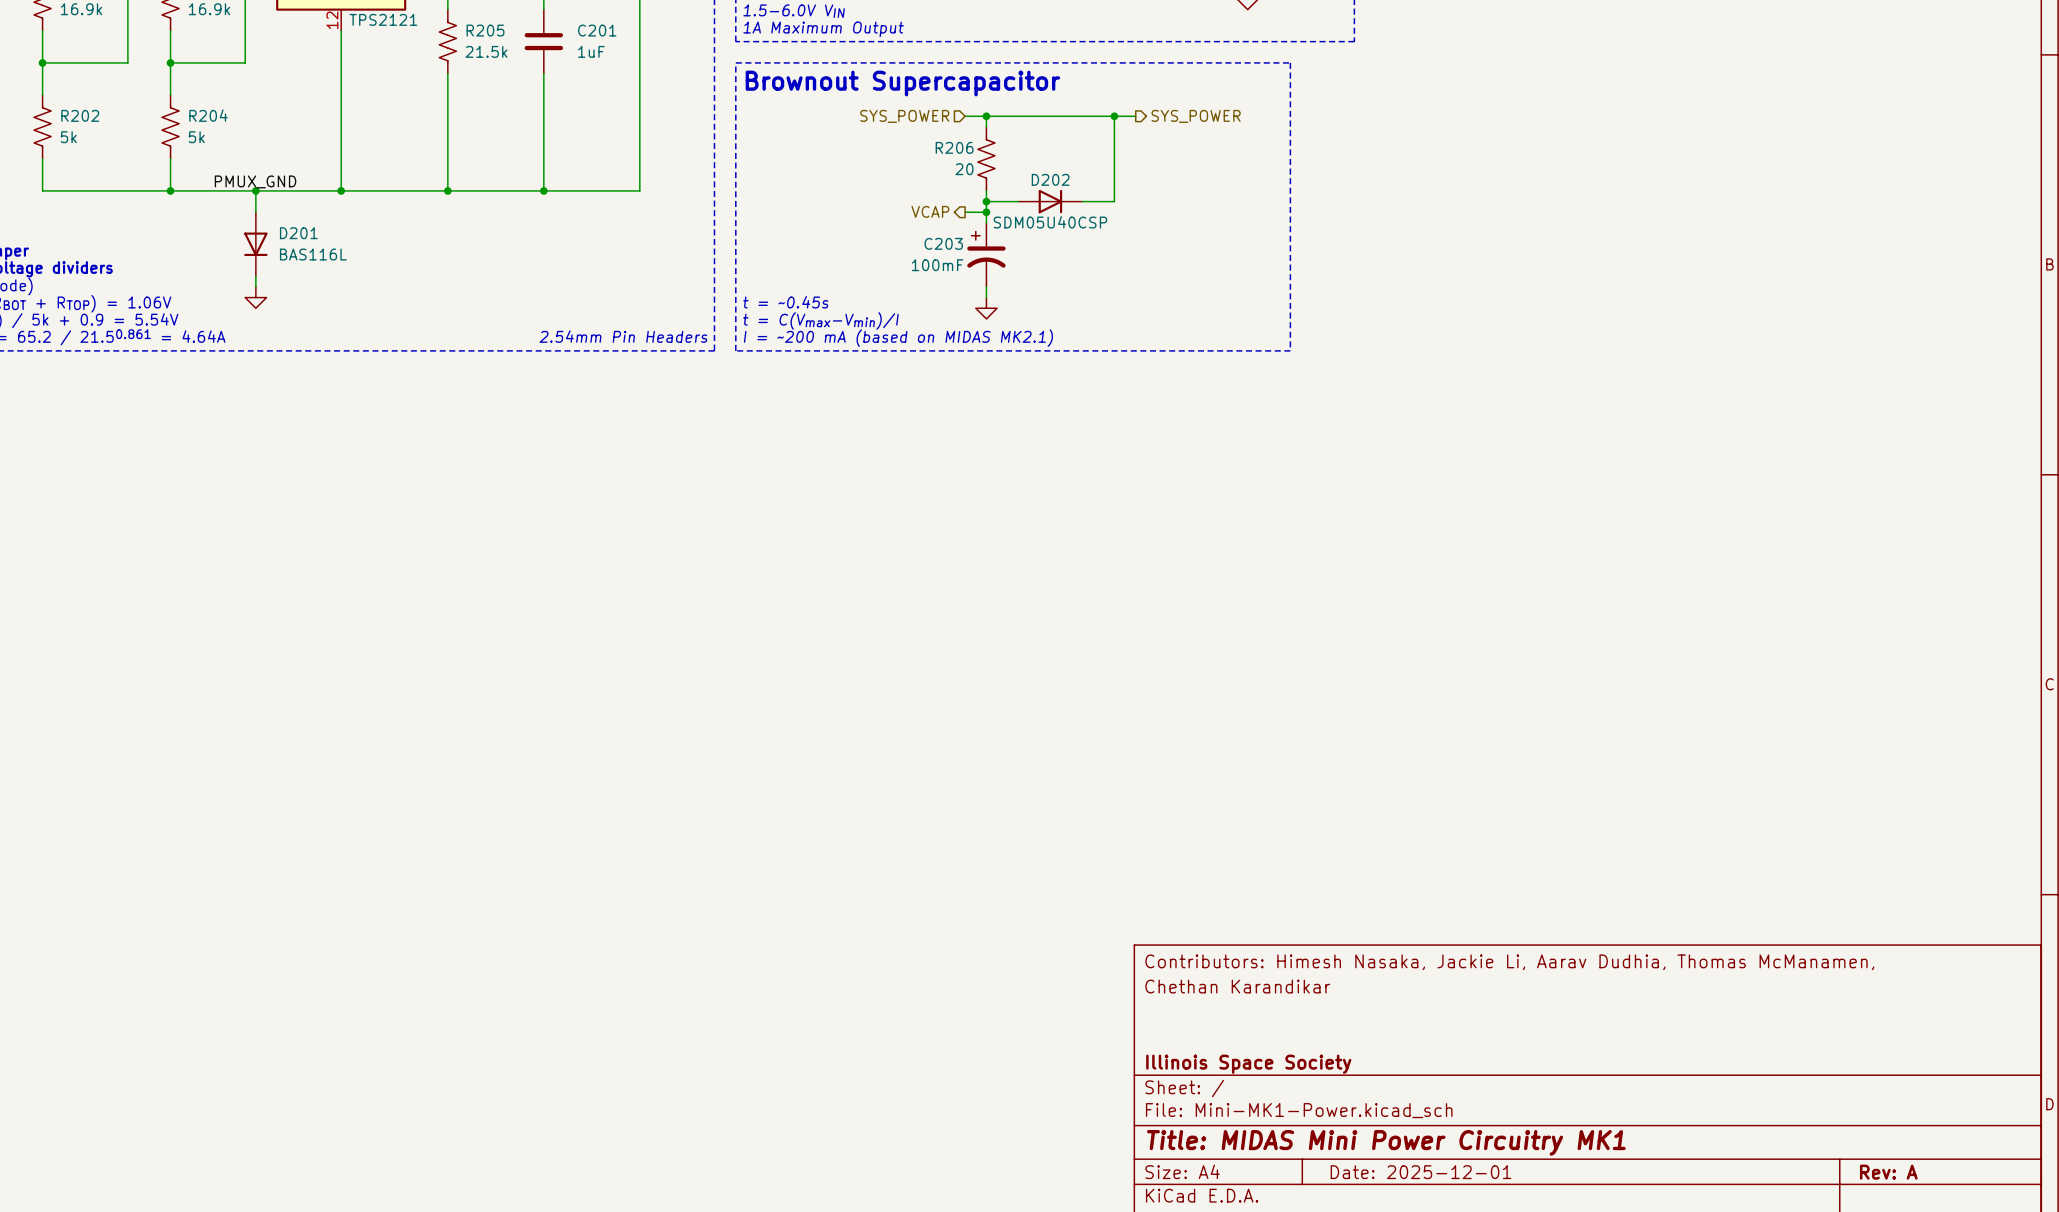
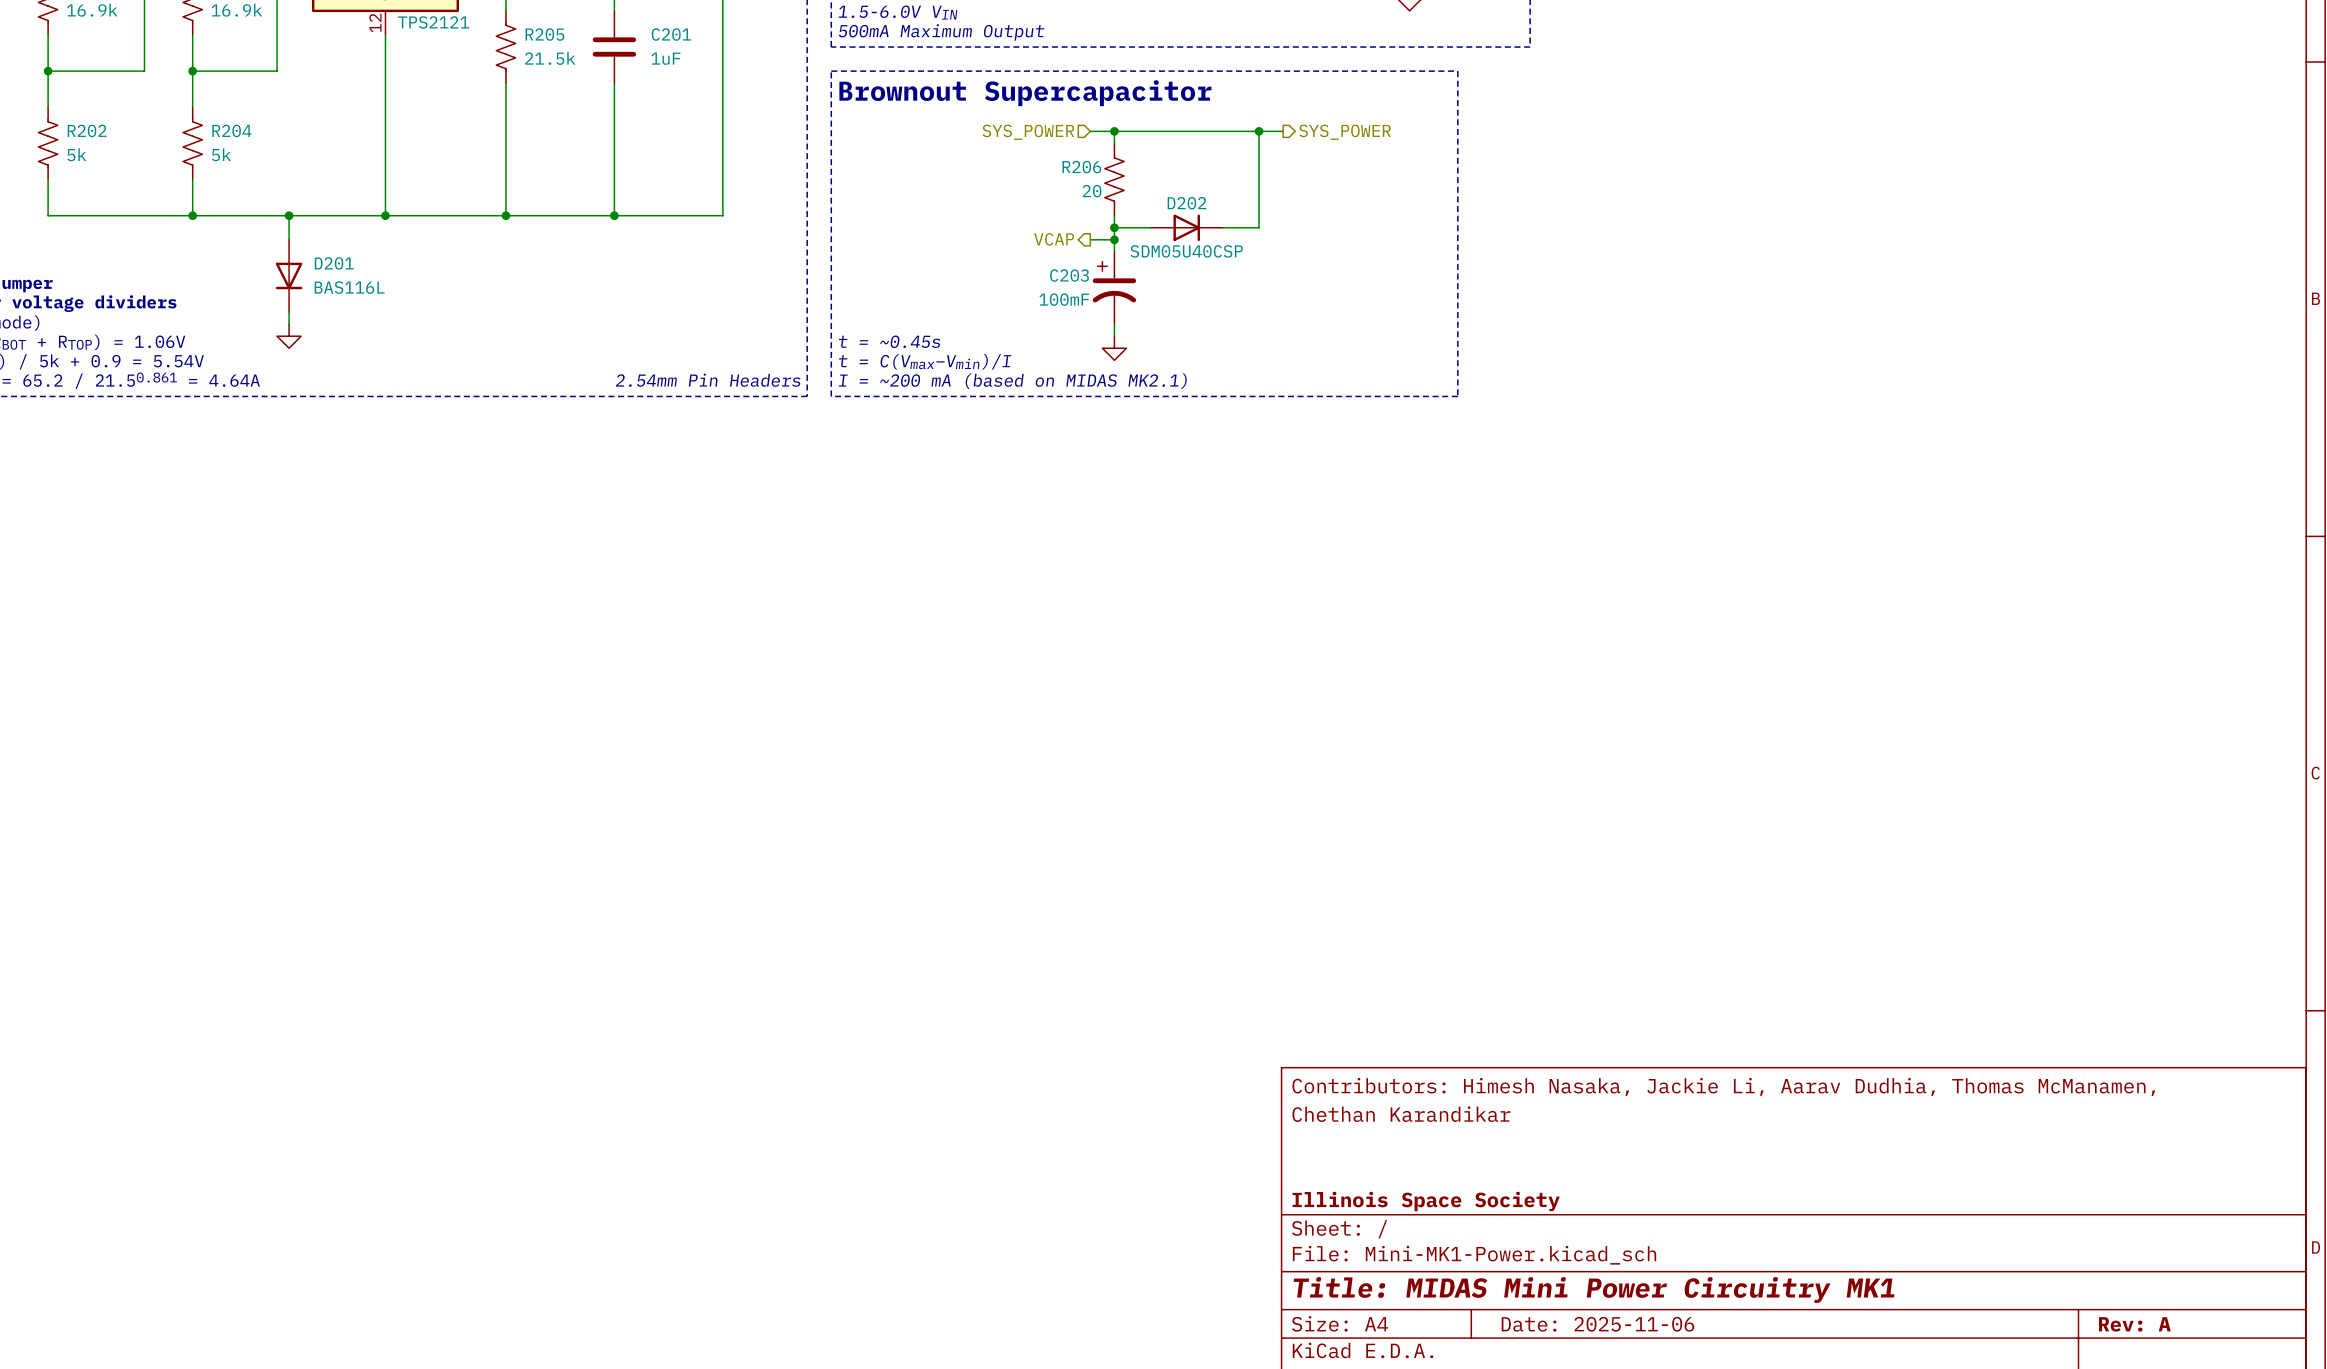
text: 1A Maximum Output (823, 29) -> 500mA Maximum Output (941, 32)
label: PMUX_GND (255, 181) -> none
title block: Date: 2025-12-01 (1421, 1172) -> Date: 2025-11-06 (1597, 1324)

